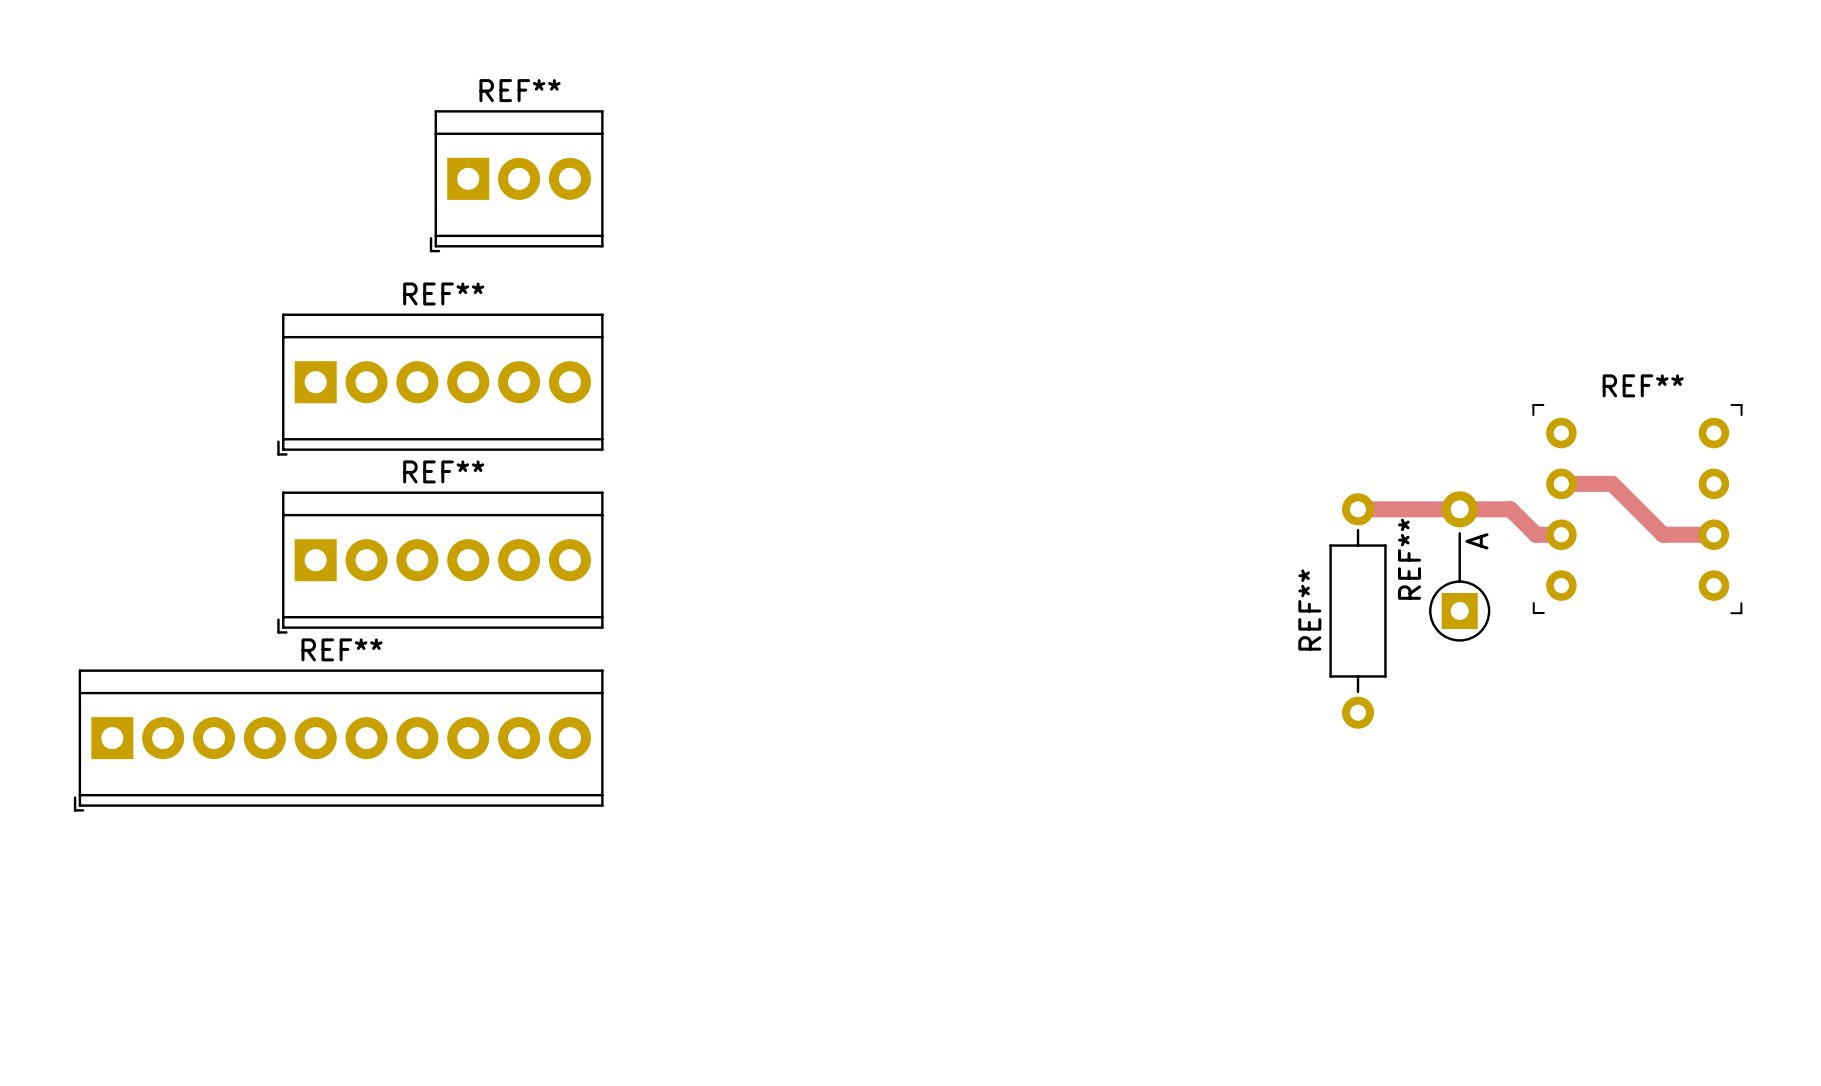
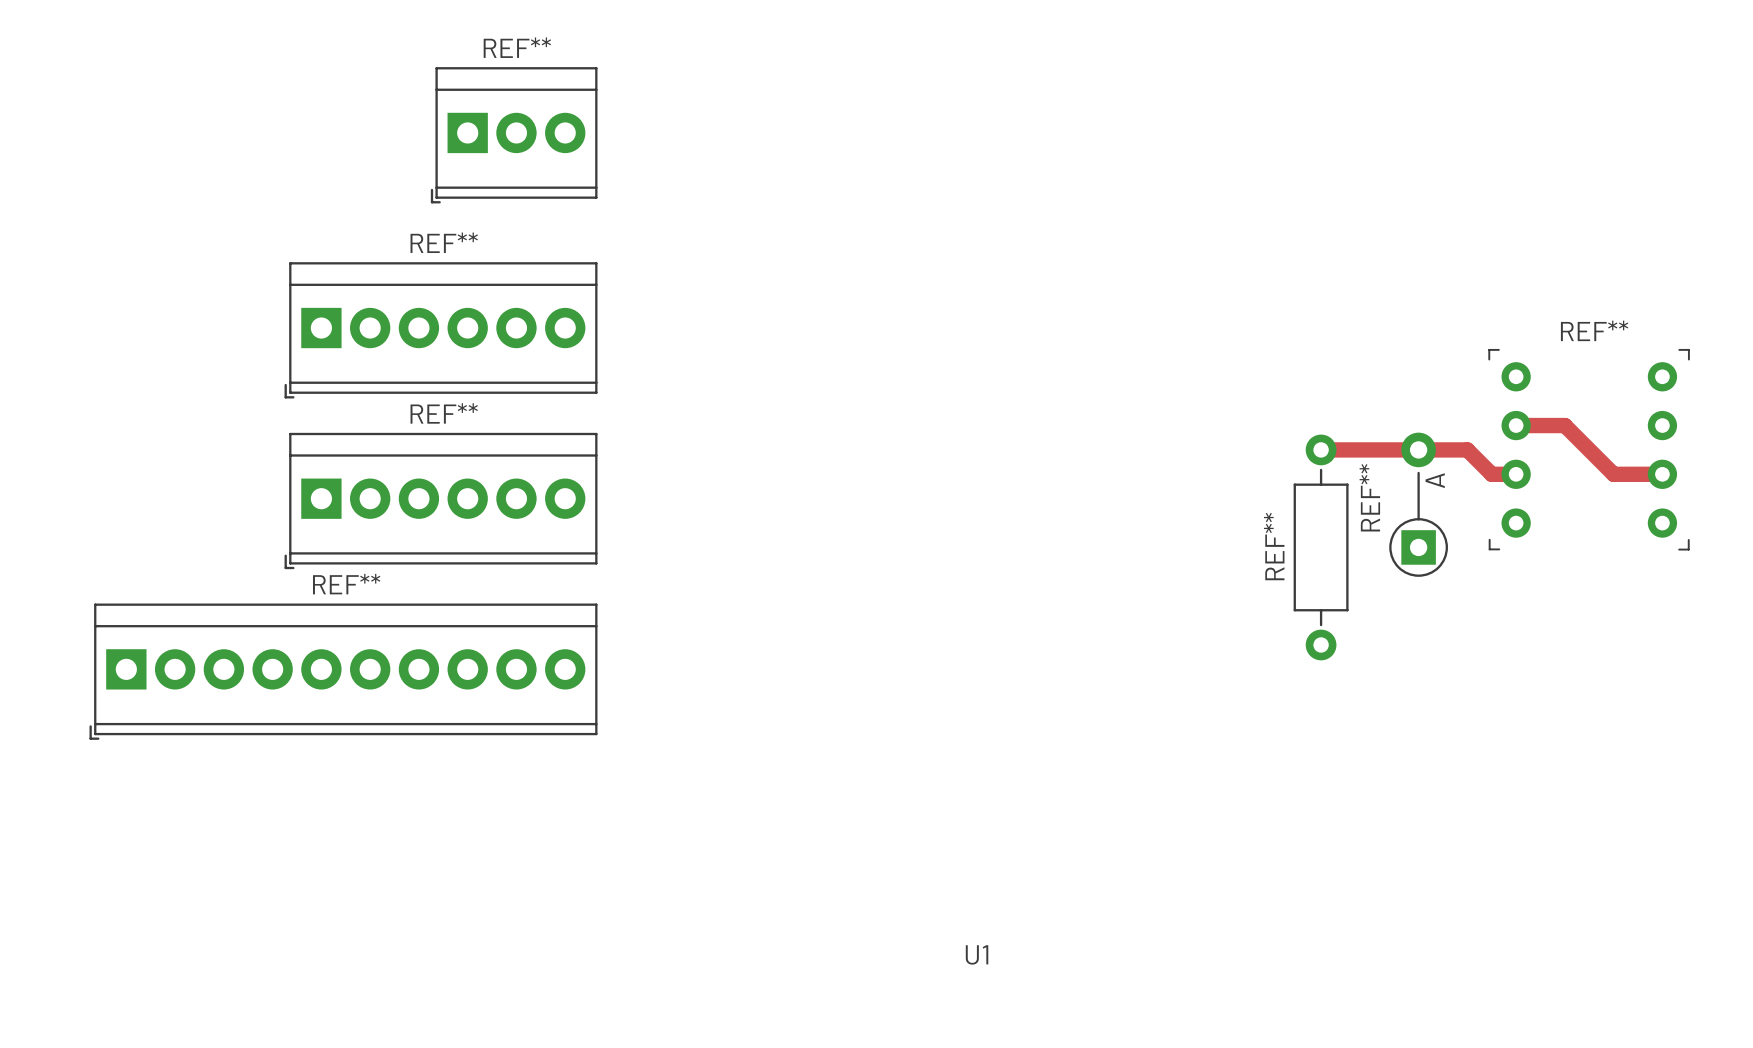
U1: none -> (977, 954)

